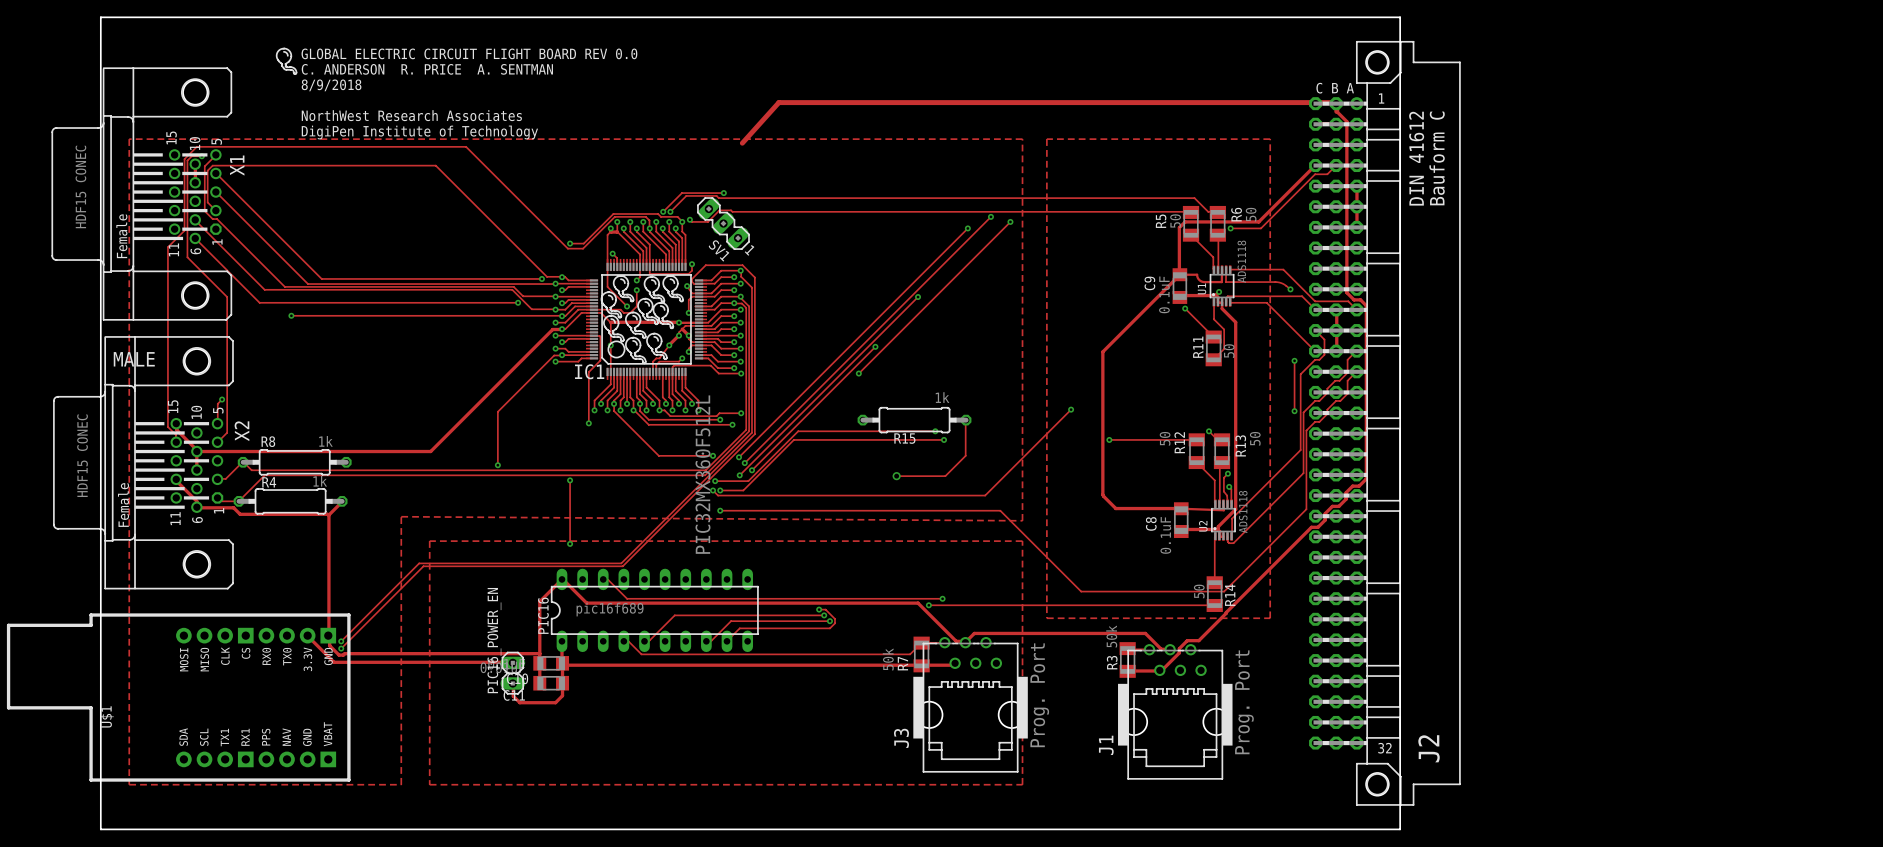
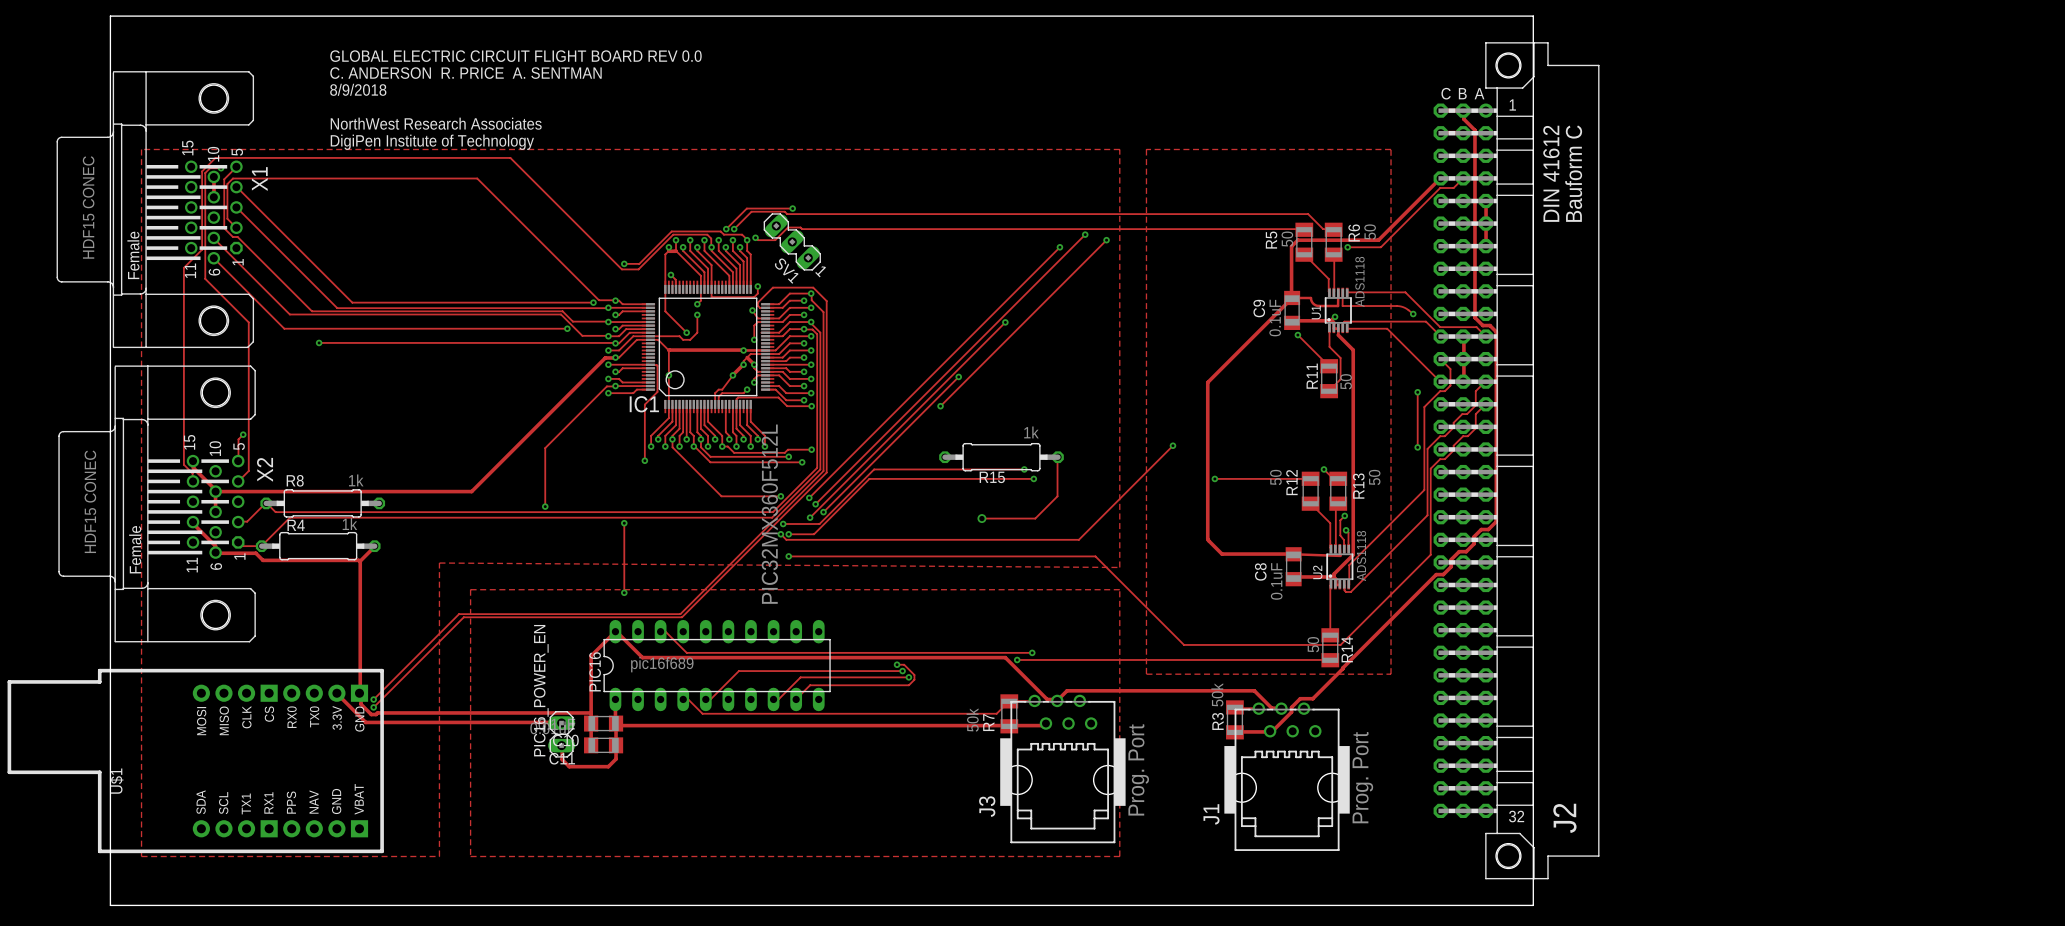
drawing: [275, 47, 298, 76] -> none
track: (1336, 111) (1335, 102) (778, 102) (742, 143) -> none
drawing: [600, 275, 684, 365] -> none
text: MALE (134, 359) -> none

